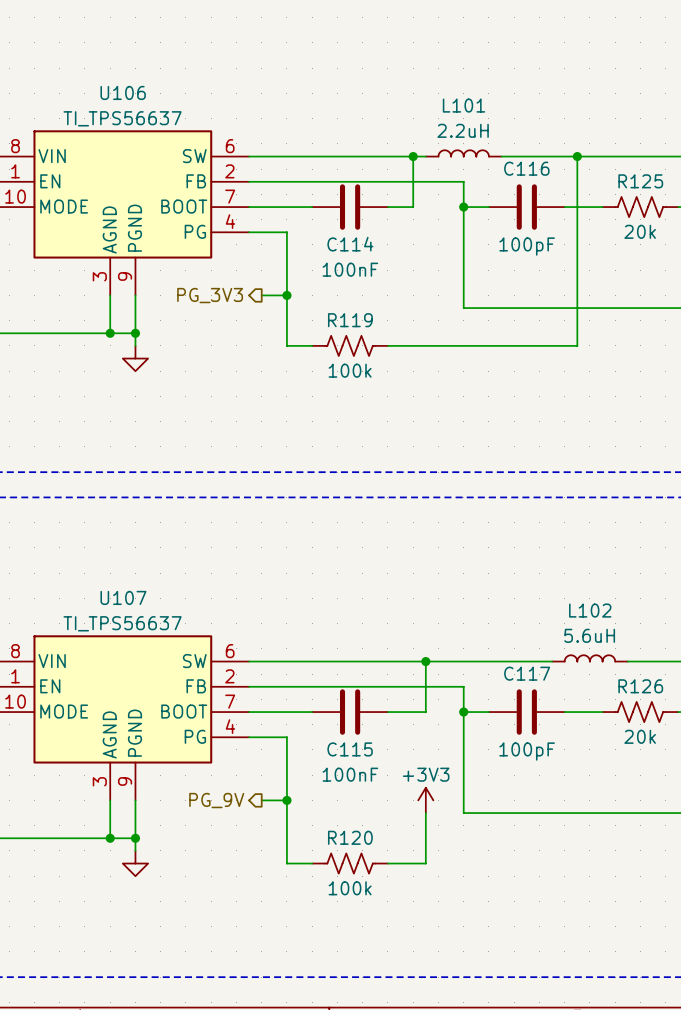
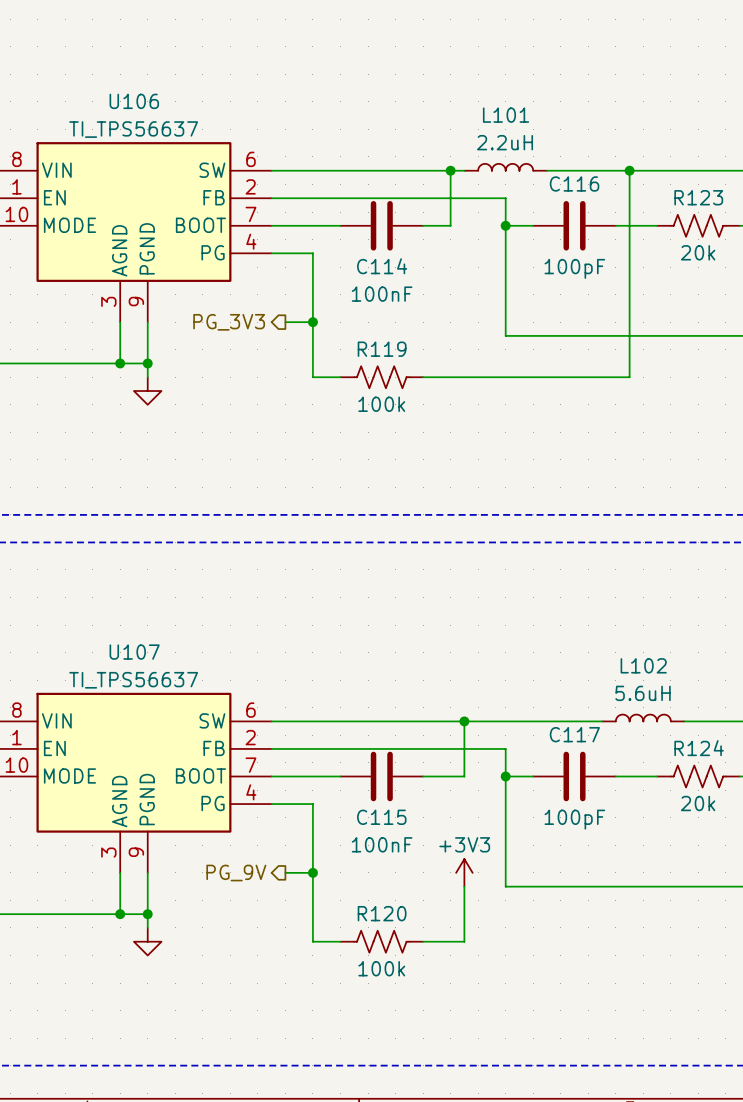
R125 name: R125 (640, 181) -> R123 (698, 197)
R126 name: R126 (640, 686) -> R124 (699, 748)

